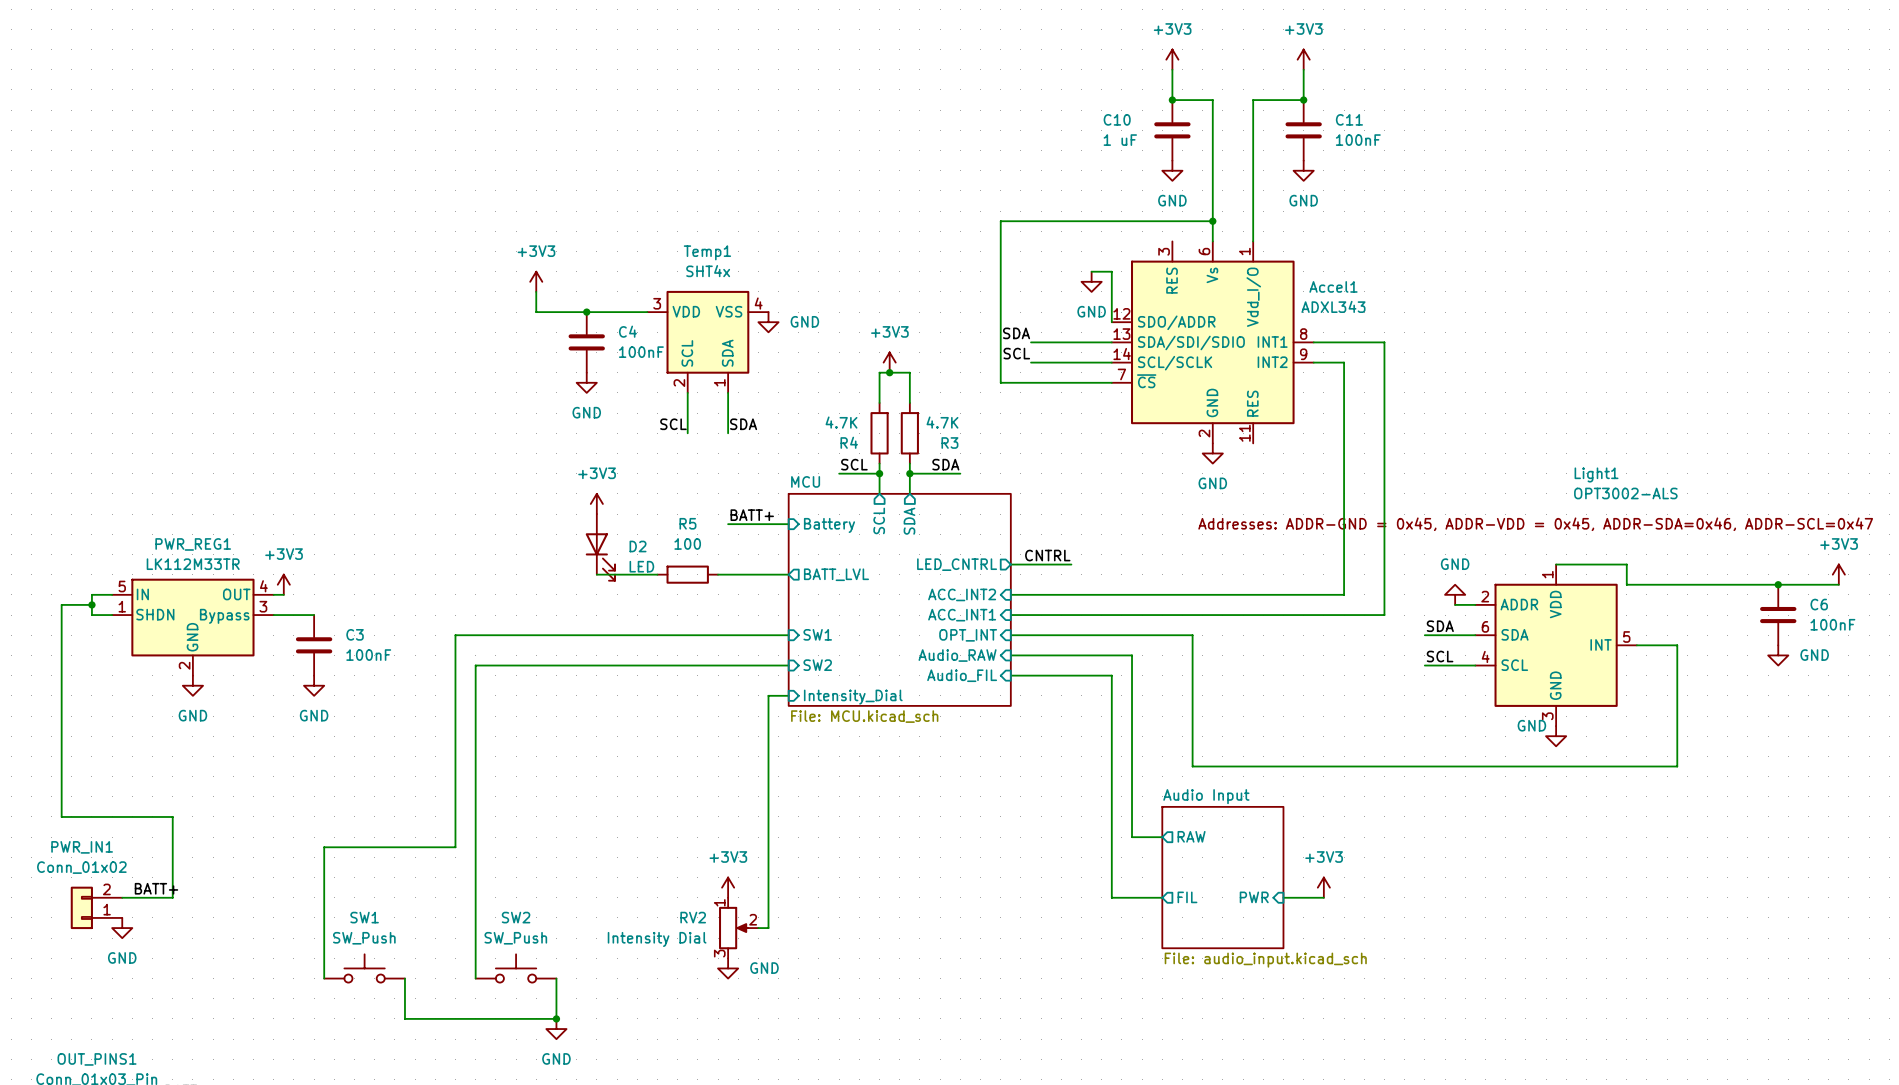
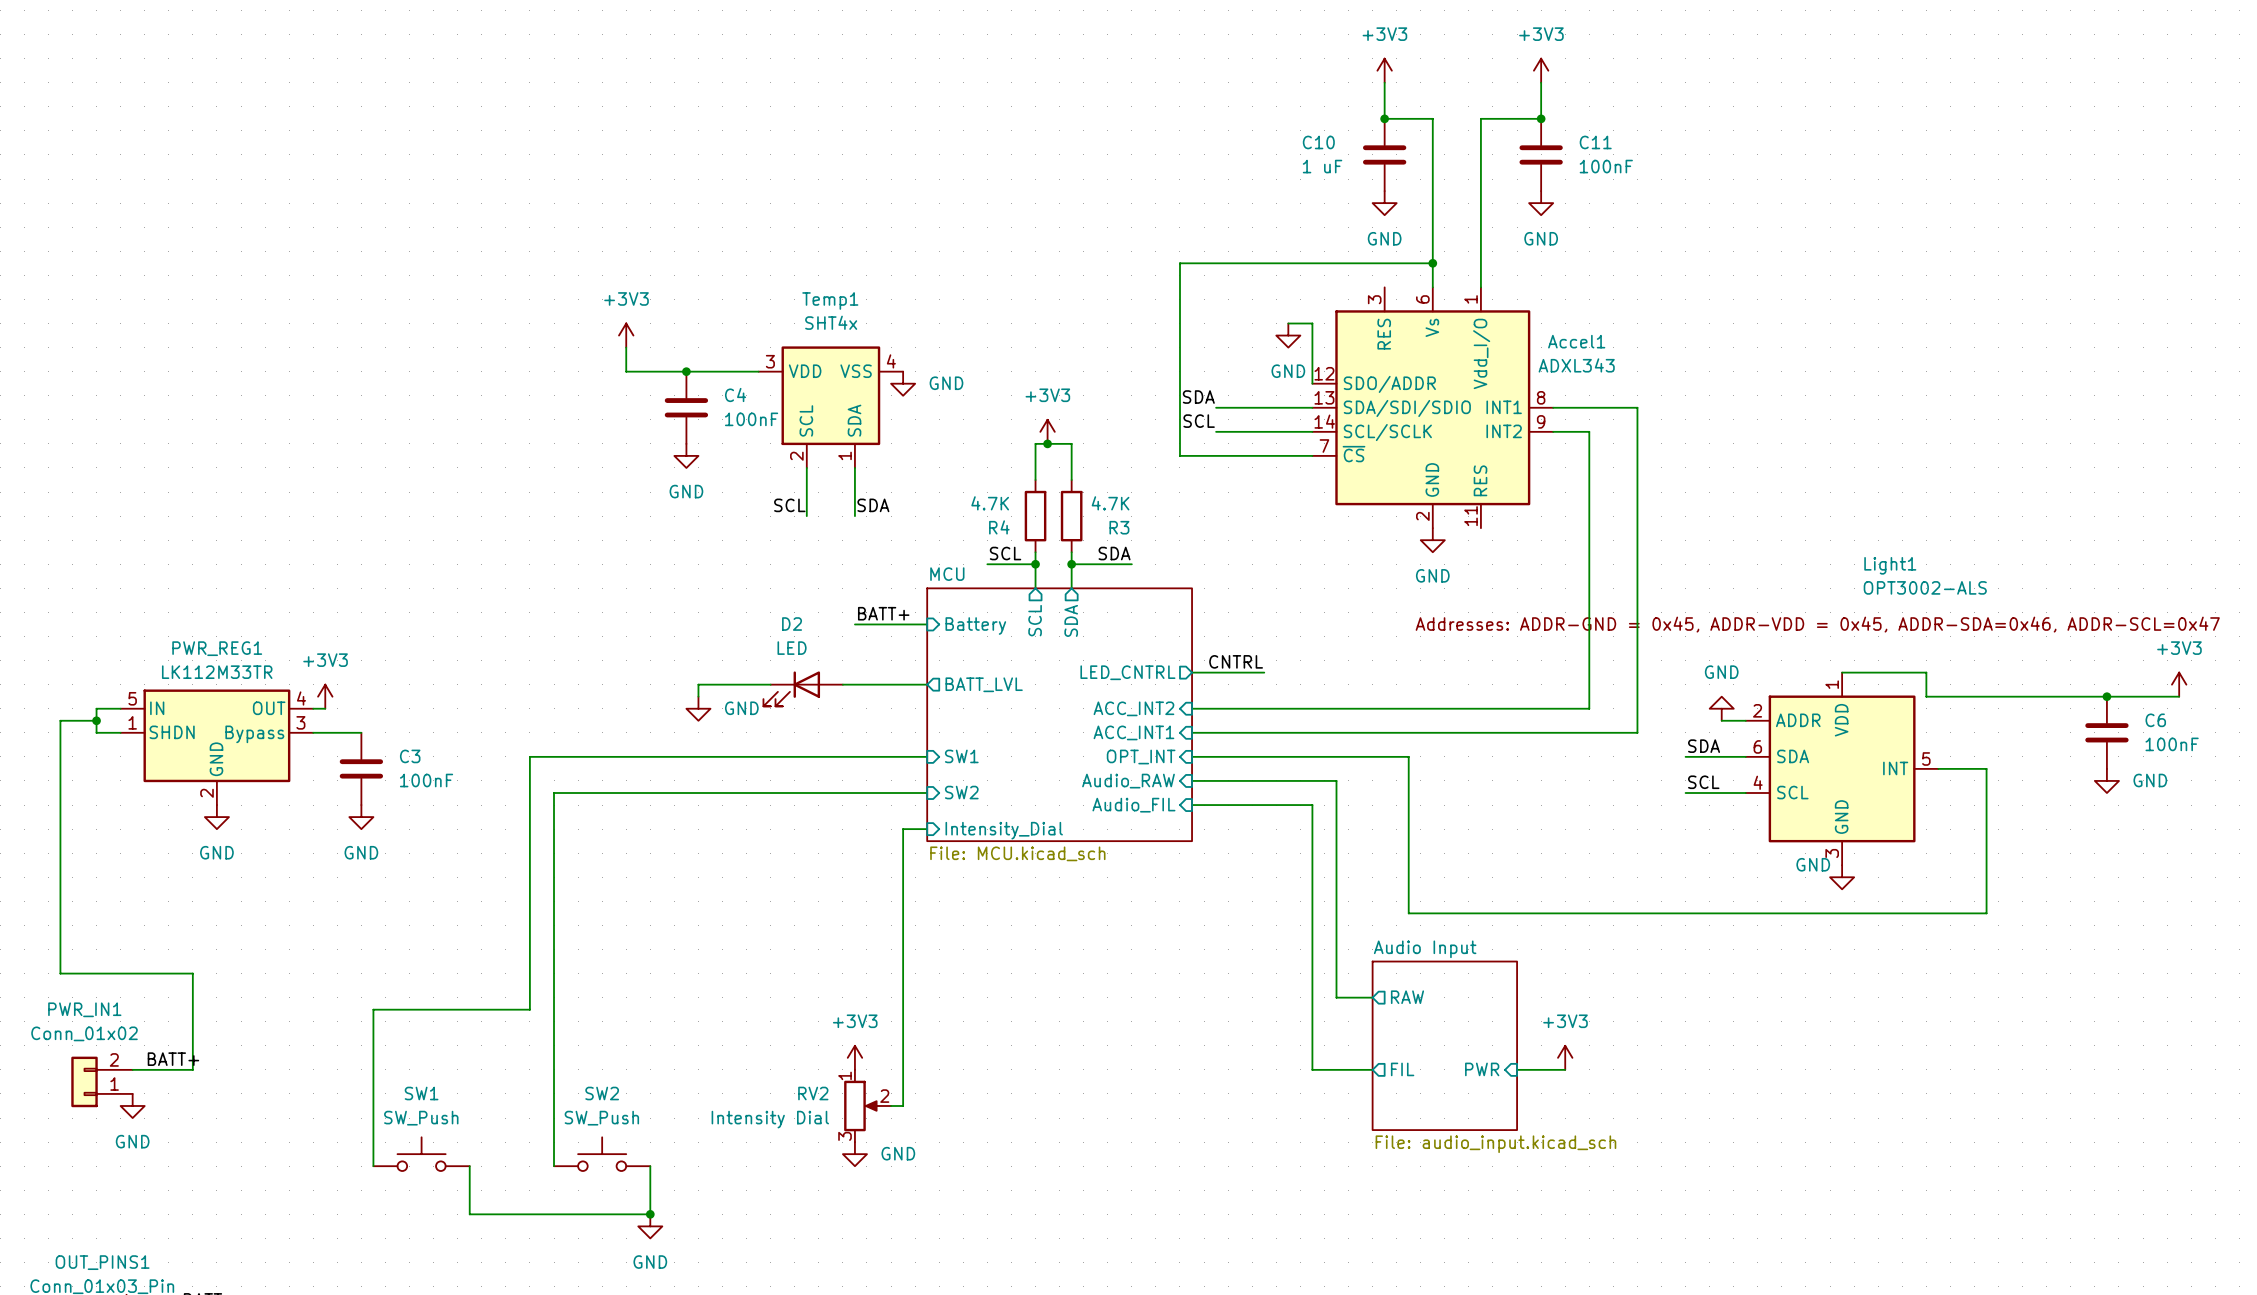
power symbol: +3V3 (596, 503) -> none
D2 name position: D2 (638, 546) -> D2 (792, 624)
D2 position: (600, 547) -> (803, 688)
D2 rotation: 0° (600, 556) -> 90° clockwise (791, 688)
D2 value position: LED (641, 566) -> LED (792, 648)
wire: none -> (698, 684) (698, 696)
R5: 100 (687, 574) -> none
power symbol: none -> GND (698, 708)

